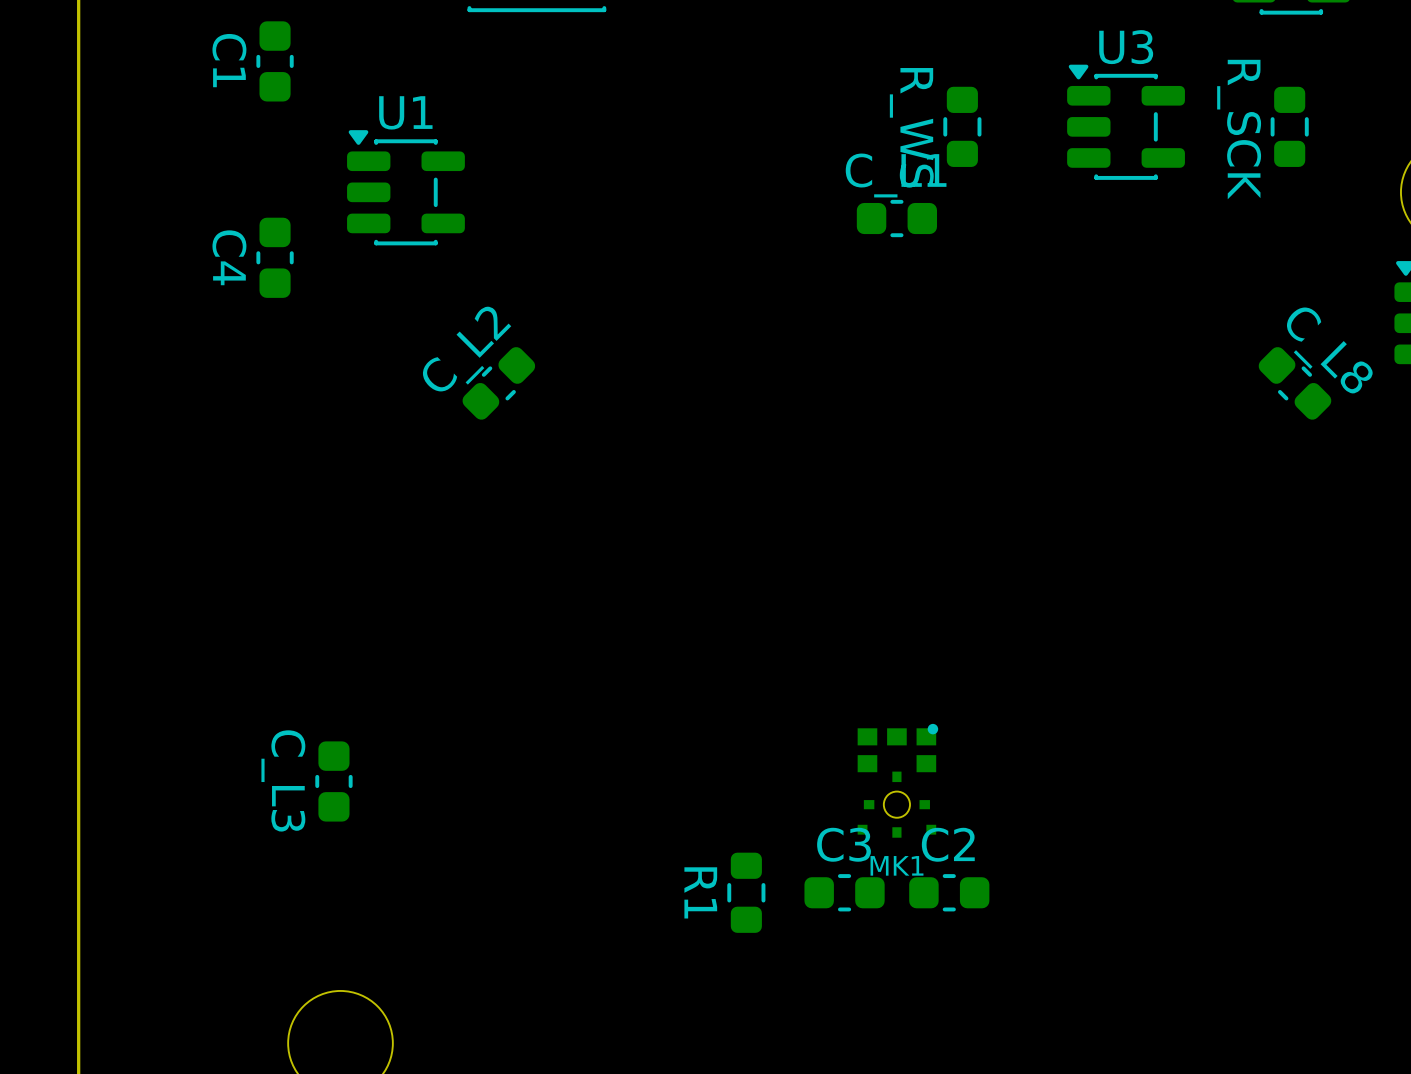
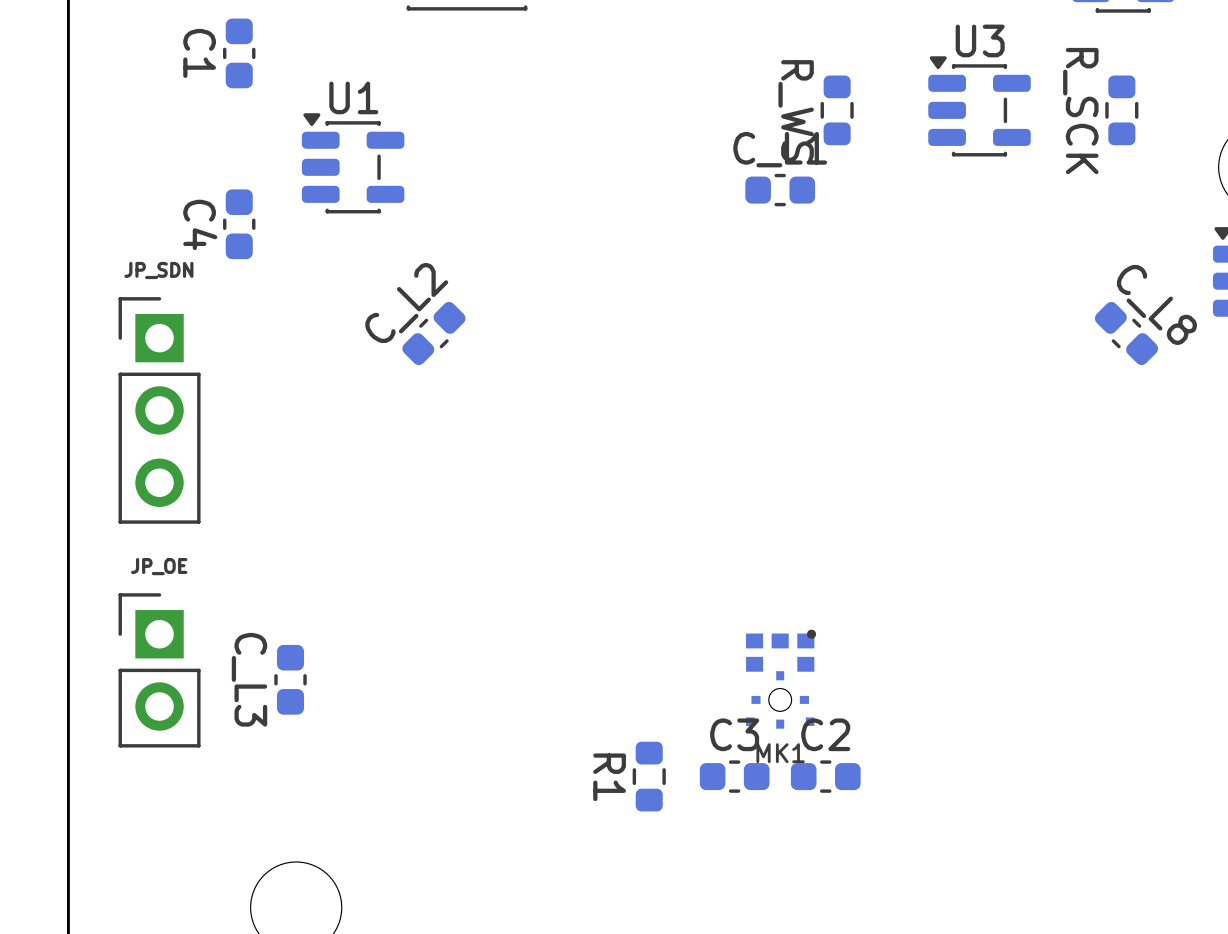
JP_SDN: none -> (159, 410)
JP_OE: none -> (159, 670)

